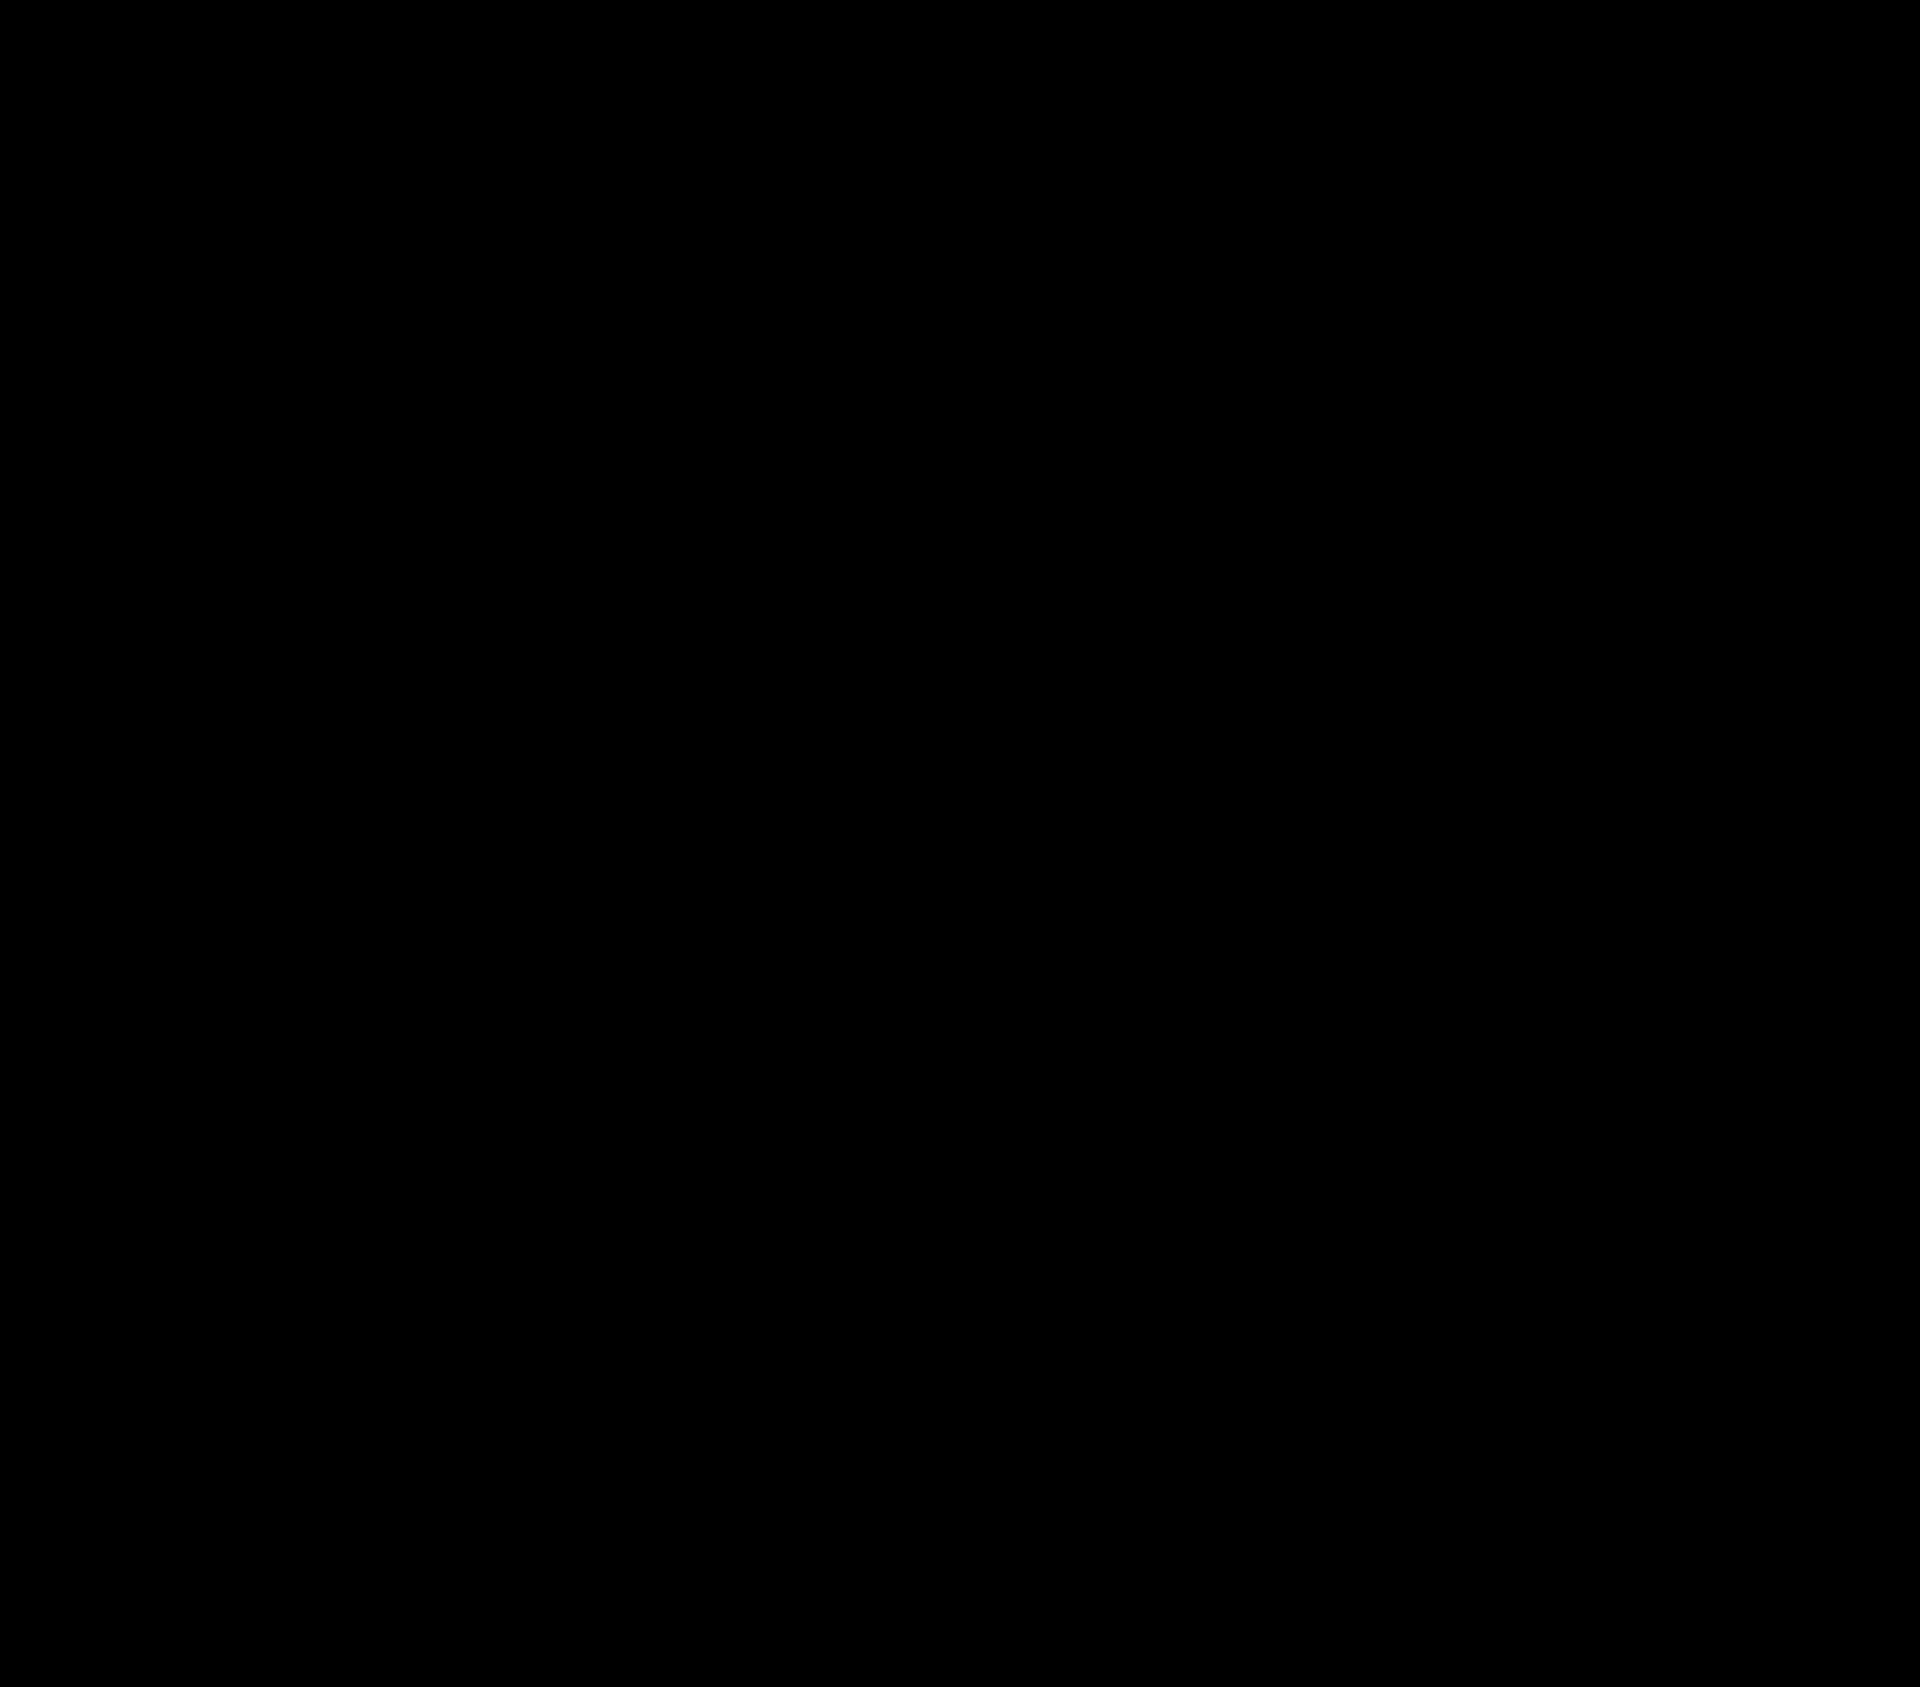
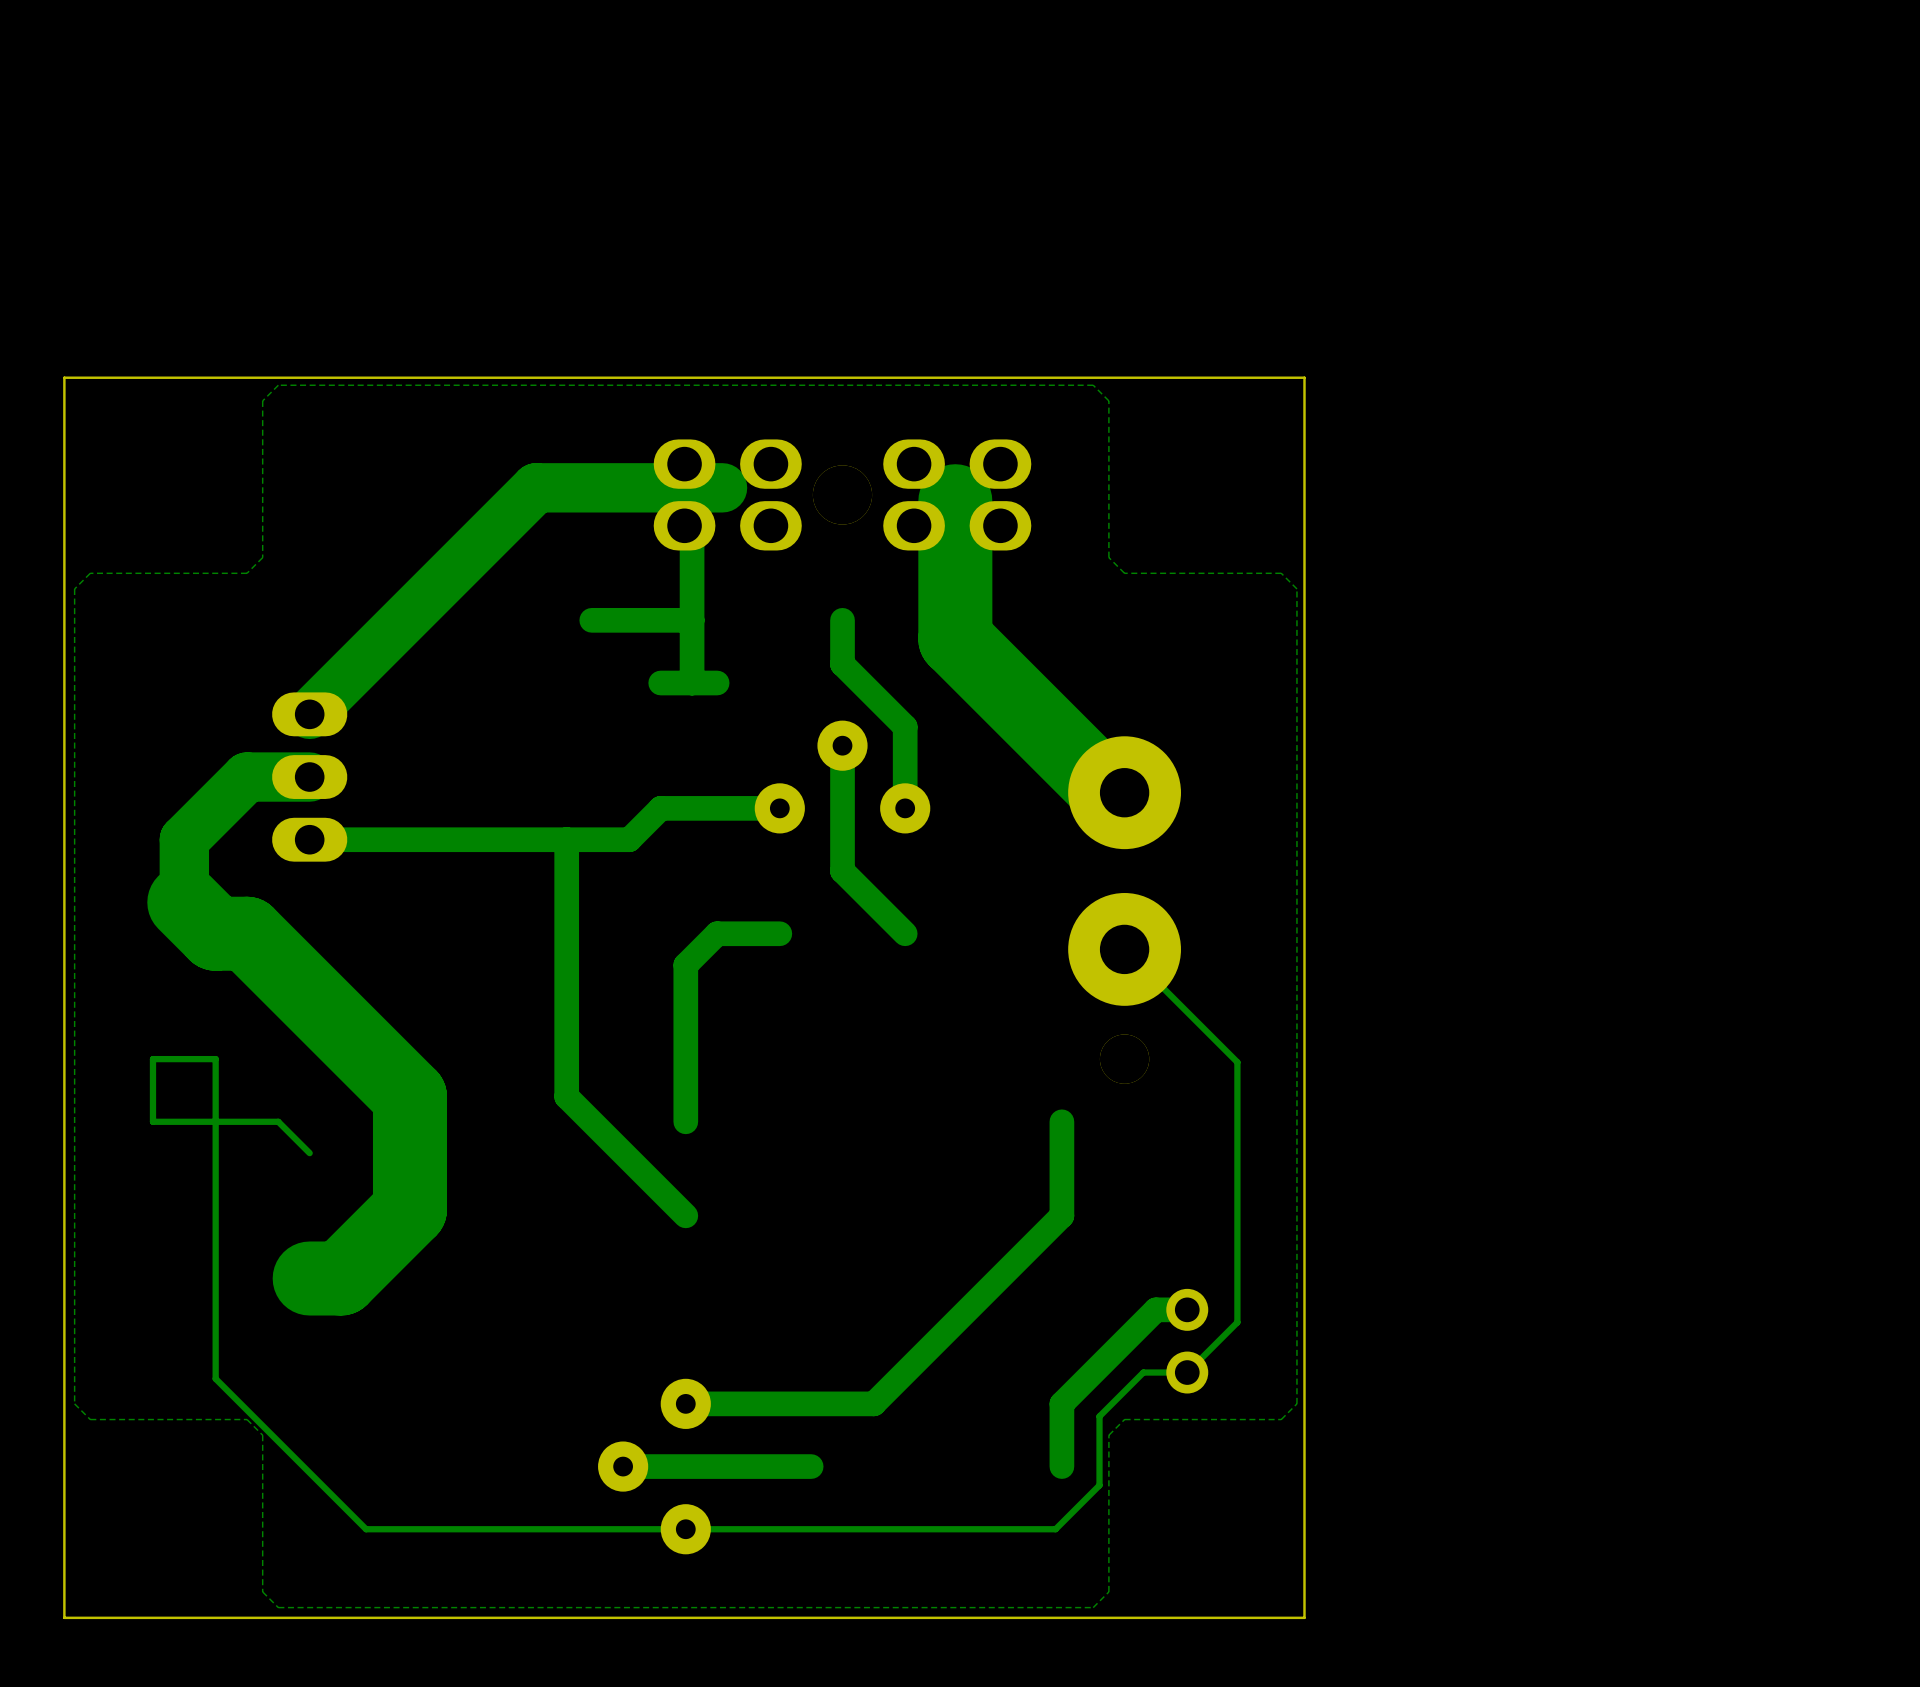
board edge: none -> (1304, 377) (1304, 1617) (64, 1617) (64, 377) (1304, 377)
zone outline: none -> (1093, 385) (1108, 400) (1108, 557) (1124, 573) (1281, 573) (1296, 588) (1296, 1403) (1281, 1419) (1124, 1419) (1108, 1435) (1108, 1591) (1093, 1607) (278, 1607) (262, 1591) (262, 1435) (247, 1419) (90, 1419) (74, 1403) (74, 588) (90, 573) (247, 573) (262, 557) (262, 400) (278, 385) (1093, 385)
track: none -> (722, 487) (536, 487) (309, 714)
part: none -> (842, 494)
track: none -> (955, 501) (955, 639) (1108, 792) (1124, 792)
track: none -> (684, 525) (692, 533) (692, 683)
track: none -> (692, 620) (591, 620)
track: none -> (842, 620) (842, 664) (905, 726) (905, 808)
track: none -> (717, 683) (660, 683)
track: none -> (842, 745) (842, 871) (905, 933)
track: none -> (309, 777) (247, 777) (184, 839) (184, 902) (215, 933) (247, 933) (409, 1096) (409, 1209) (341, 1278) (309, 1278)
part: none -> (309, 777)
part: none -> (842, 777)
track: none -> (779, 808) (660, 808) (629, 839) (309, 839)
track: none -> (566, 839) (566, 1096) (685, 1215)
part: none -> (1124, 910)
track: none -> (779, 933) (717, 933) (685, 965) (685, 1121)
track: none -> (1124, 949) (1237, 1062) (1237, 1322) (1187, 1372) (1143, 1372) (1099, 1416) (1099, 1485) (1055, 1529) (366, 1529) (215, 1378) (215, 1059) (152, 1059) (152, 1121) (278, 1121) (309, 1153)
track: none -> (1061, 1121) (1061, 1215) (873, 1403) (685, 1403)
track: none -> (1187, 1309) (1155, 1309) (1061, 1403) (1061, 1466)
part: none -> (1187, 1341)
part: none -> (654, 1466)
track: none -> (811, 1466) (623, 1466)

